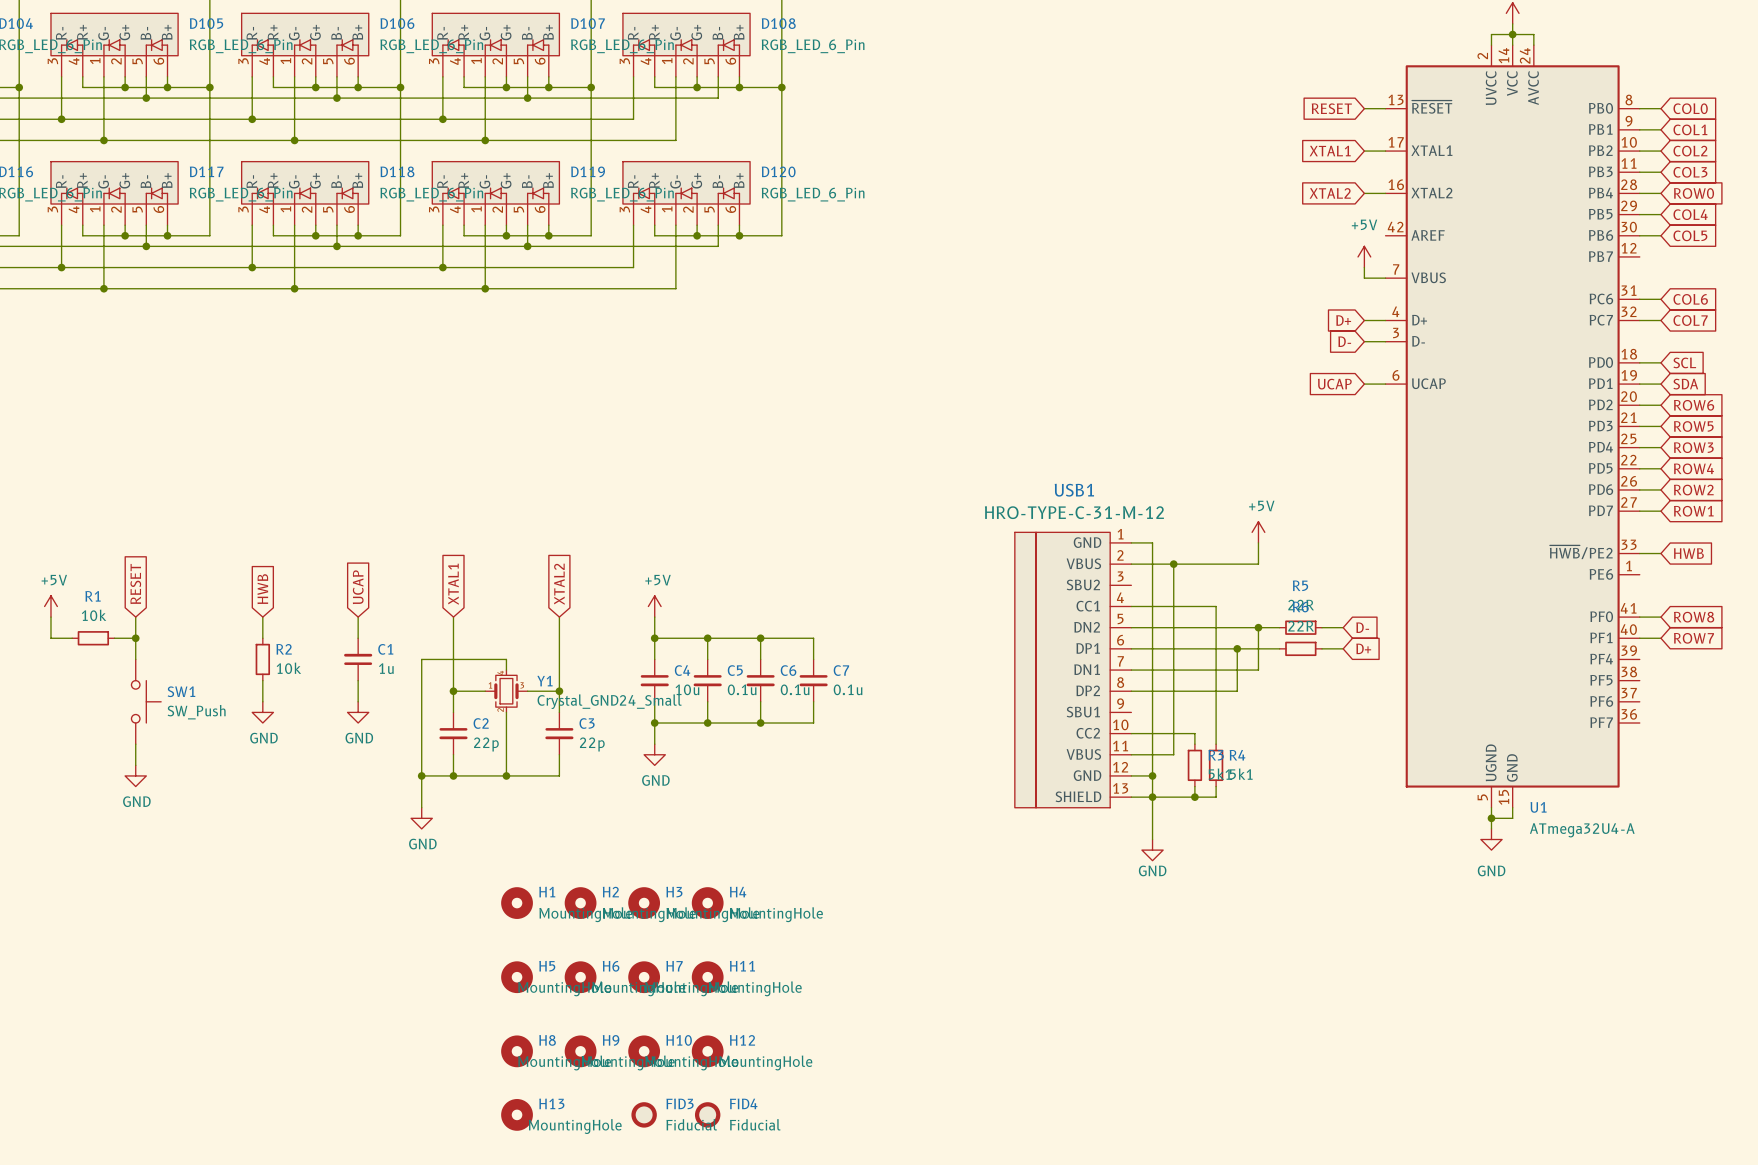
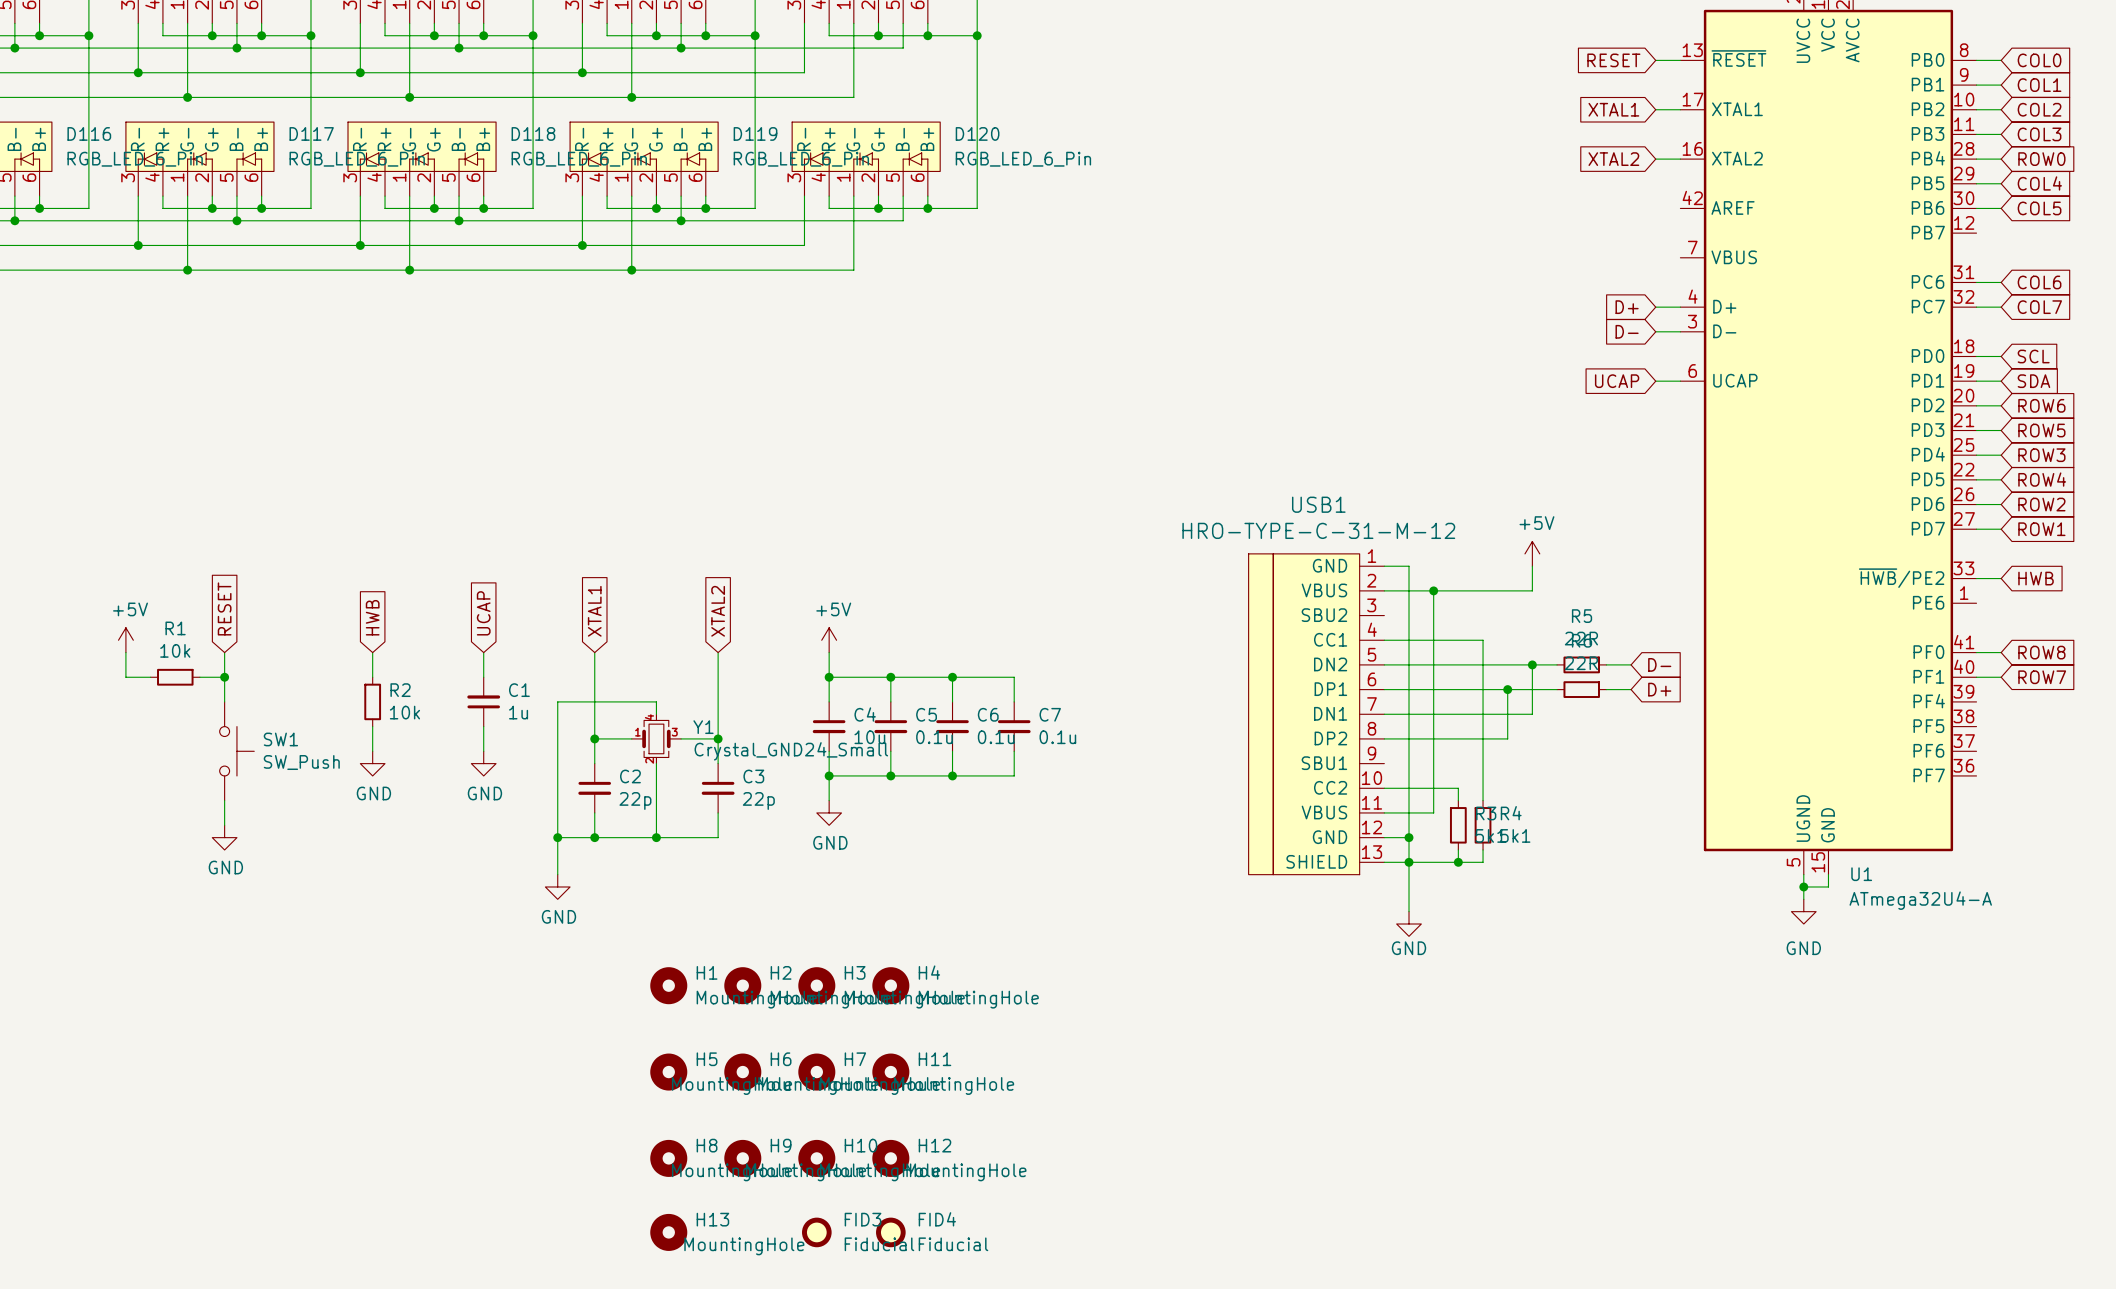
power symbol: +5V (1364, 256) -> none
wire: (1364, 267) (1364, 278) (1385, 278) -> none

